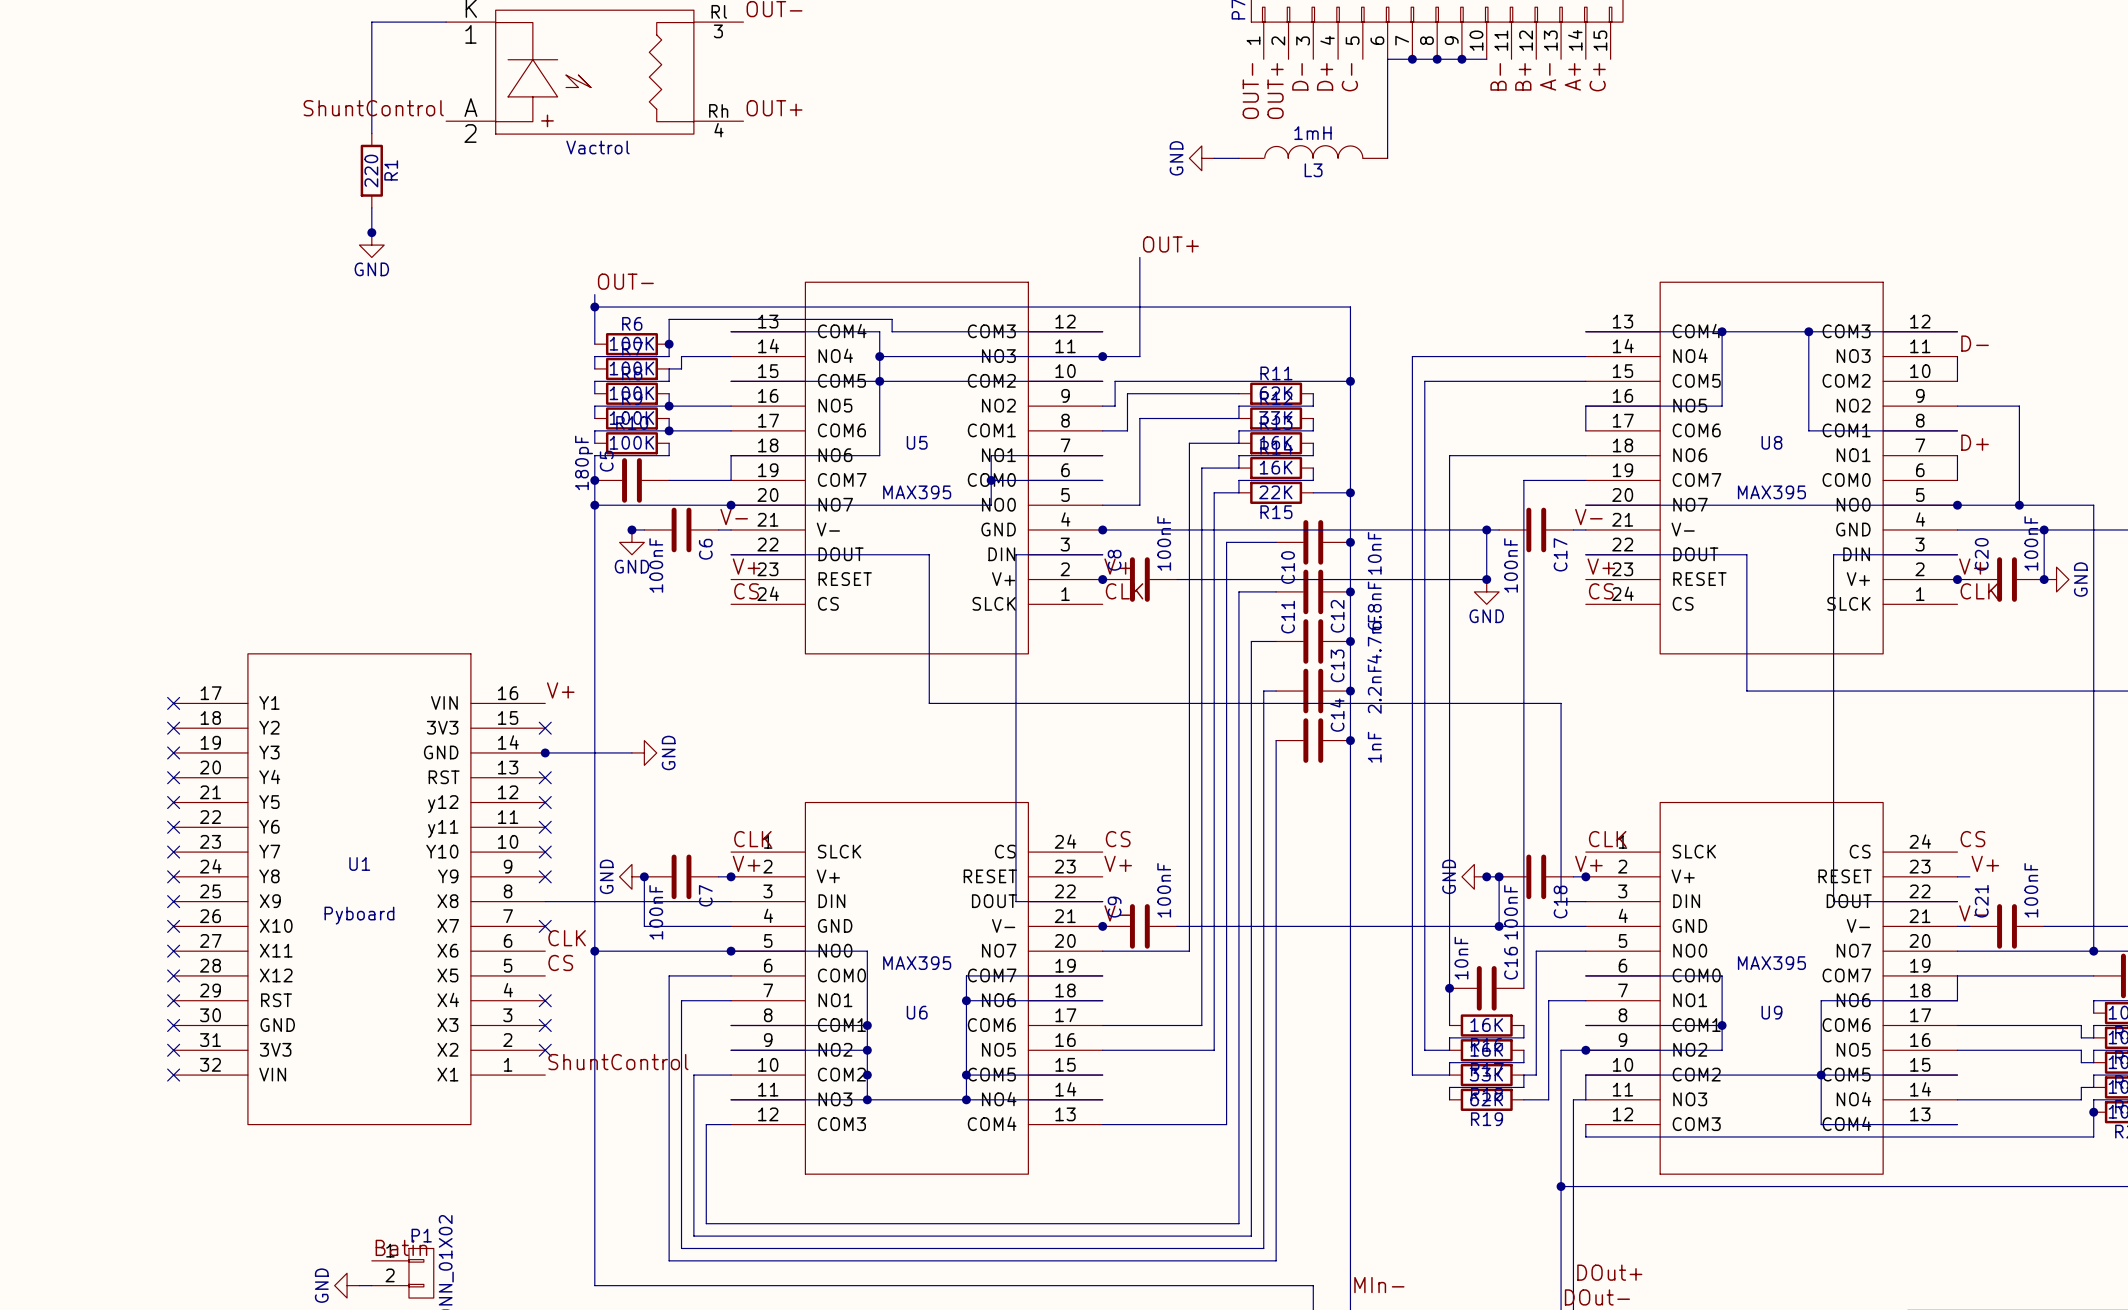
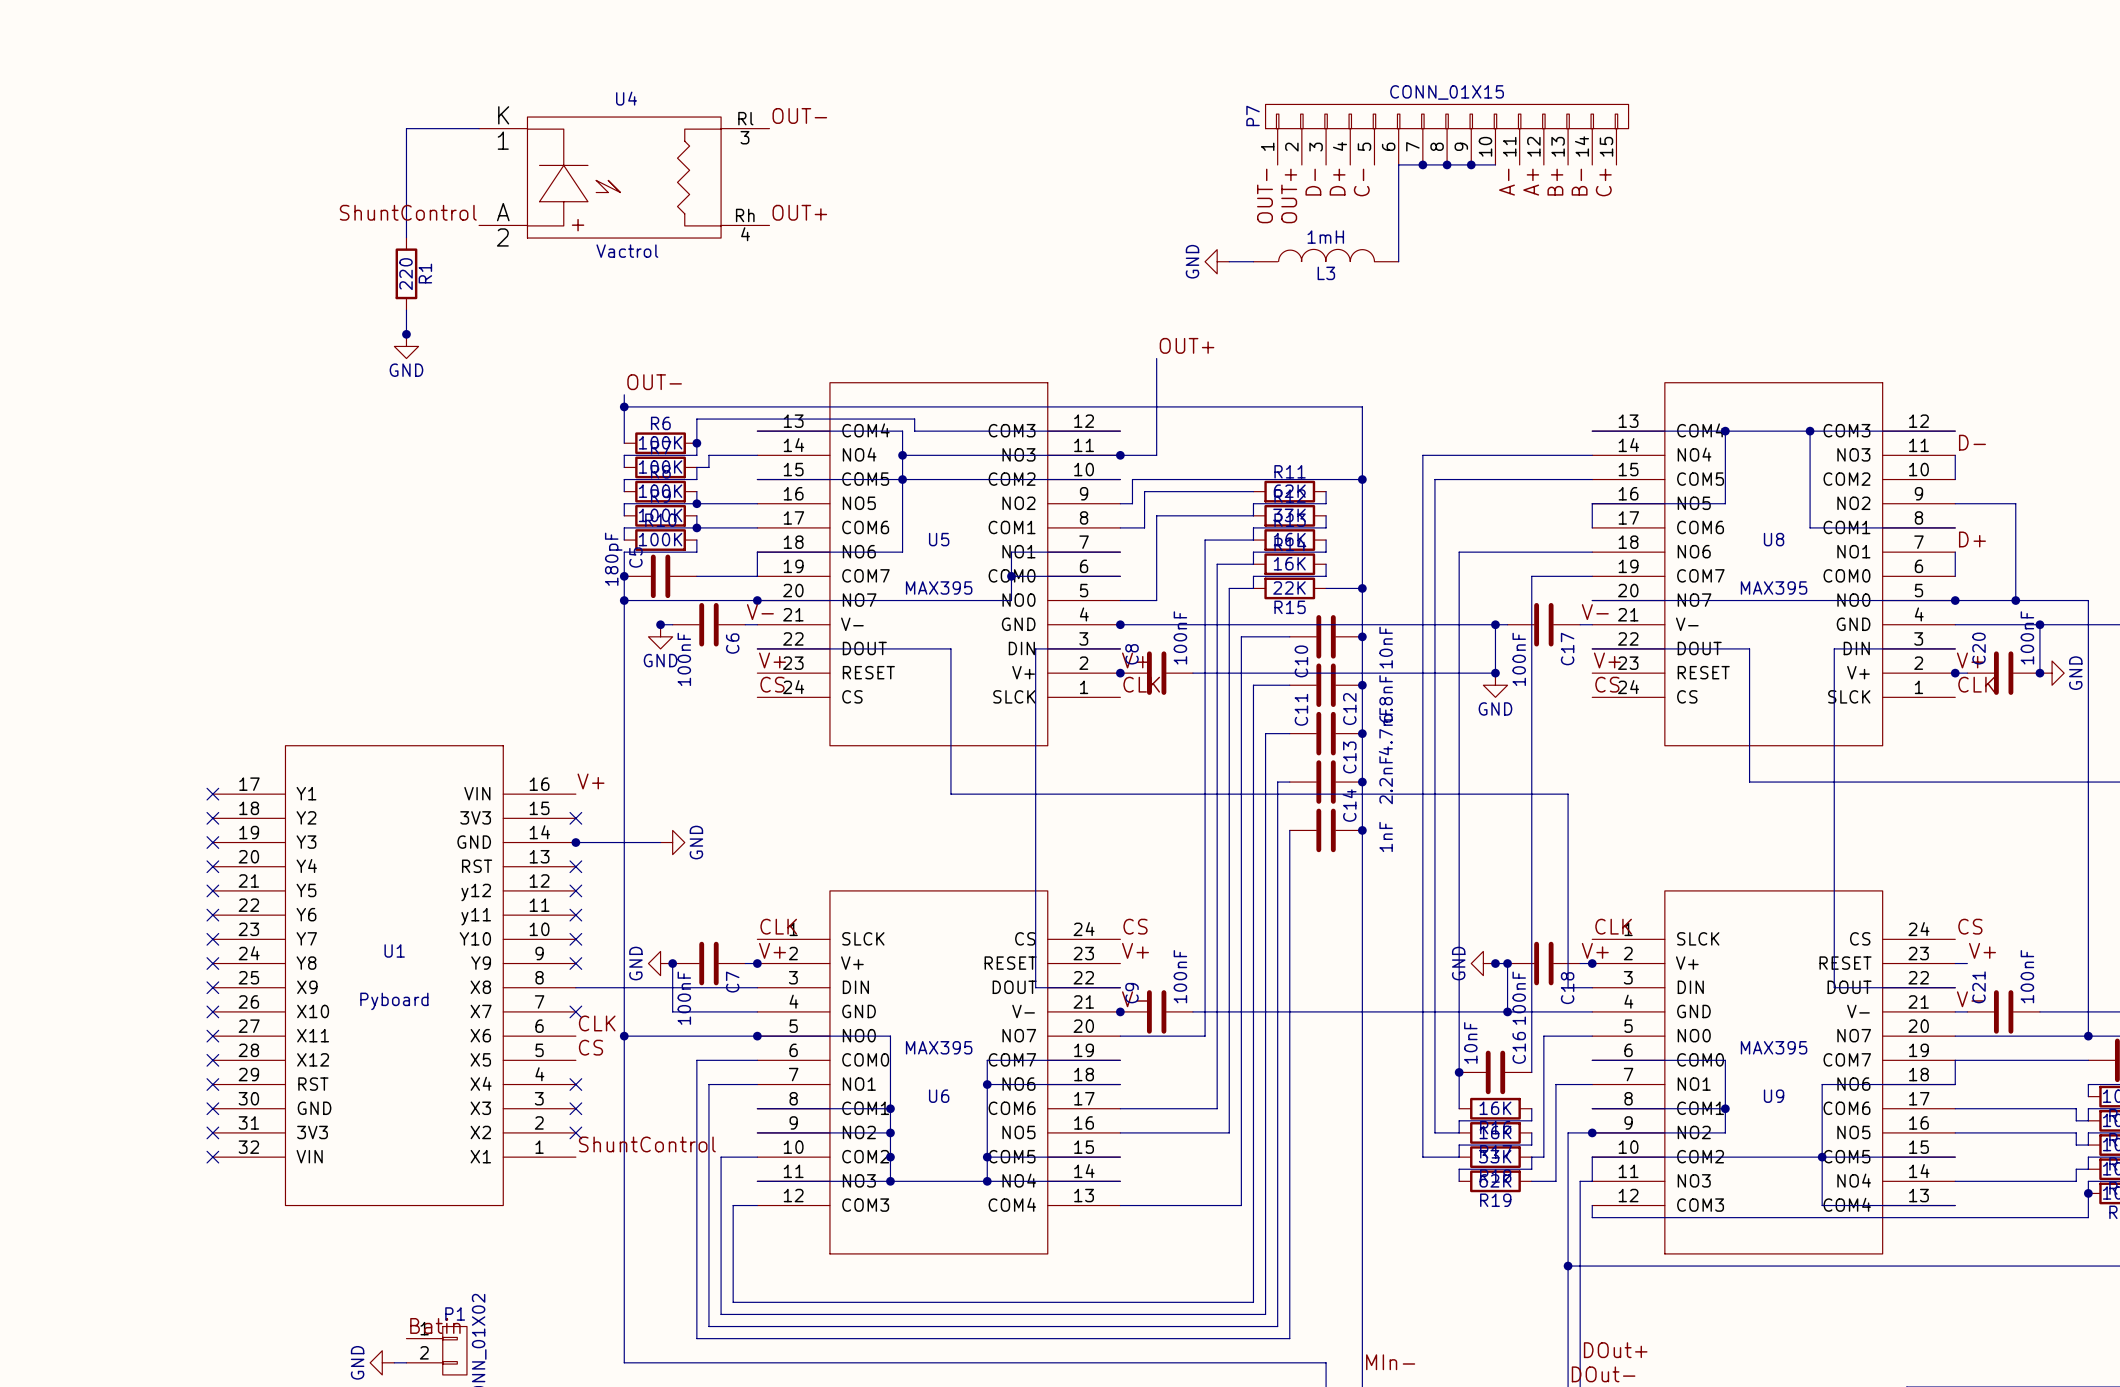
label: B- (1498, 76) -> A- (1506, 182)
label: B+ (1523, 76) -> A+ (1531, 182)
label: A- (1548, 76) -> B+ (1555, 182)
label: A+ (1572, 76) -> B- (1579, 182)

